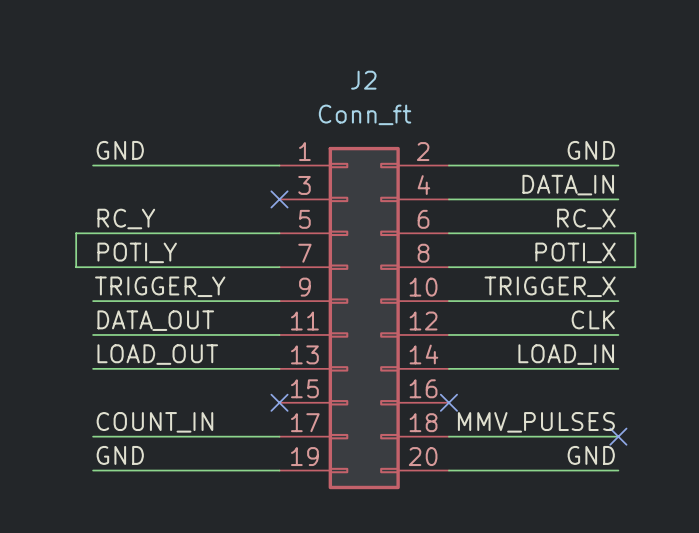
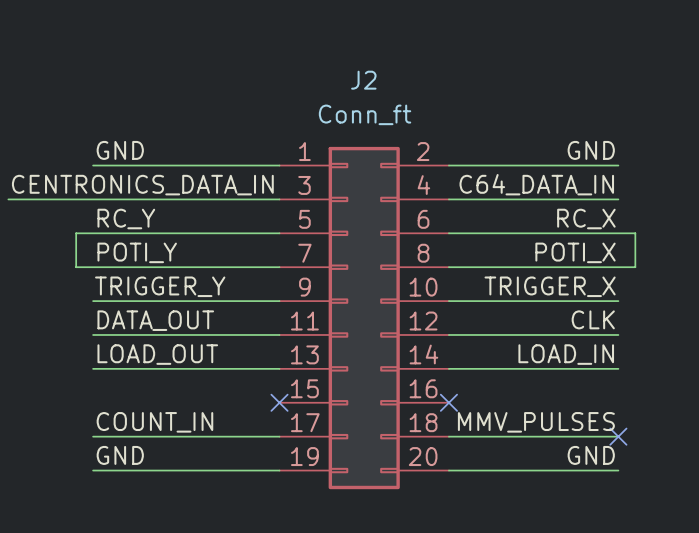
label: none -> CENTRONICS_DATA_IN (142, 185)
label: DATA_IN (568, 185) -> C64_DATA_IN (536, 184)
wire: none -> (8, 199) (279, 199)
no-connect mark: (279, 199) -> none

